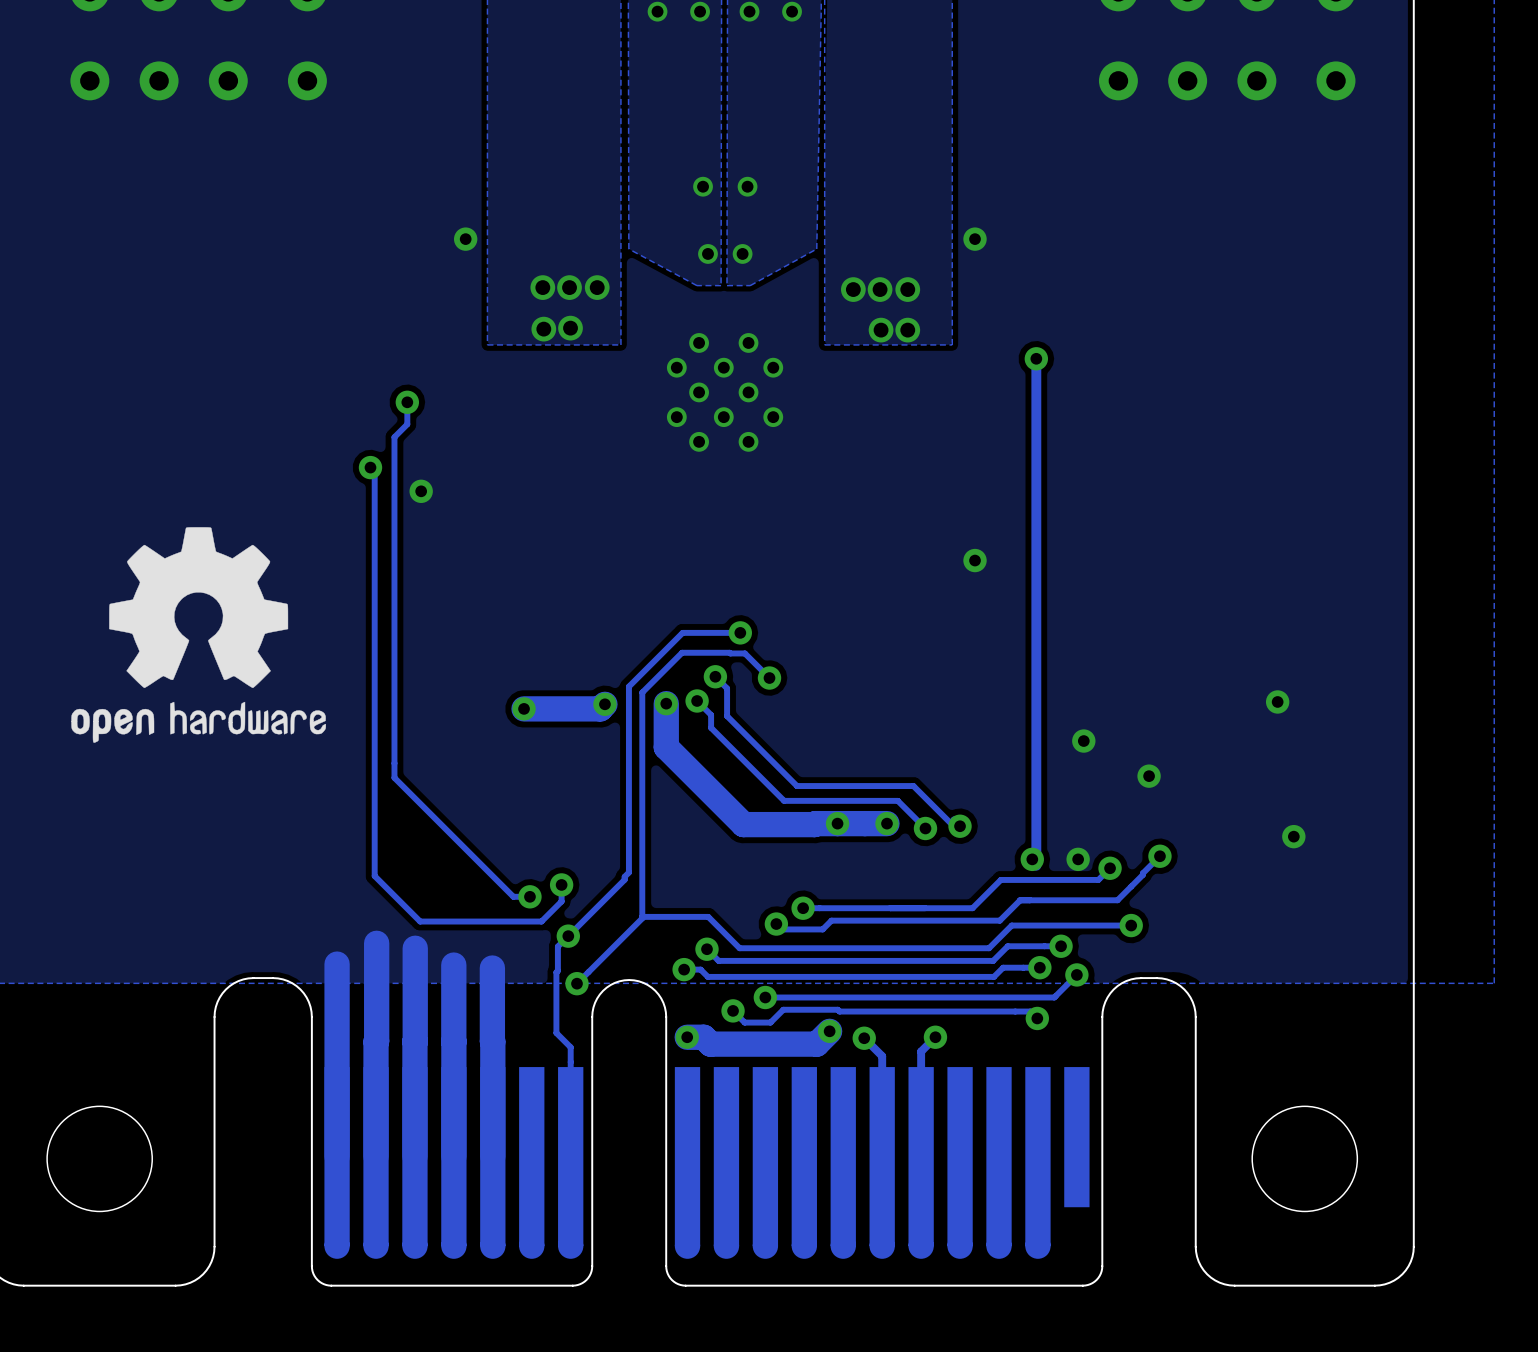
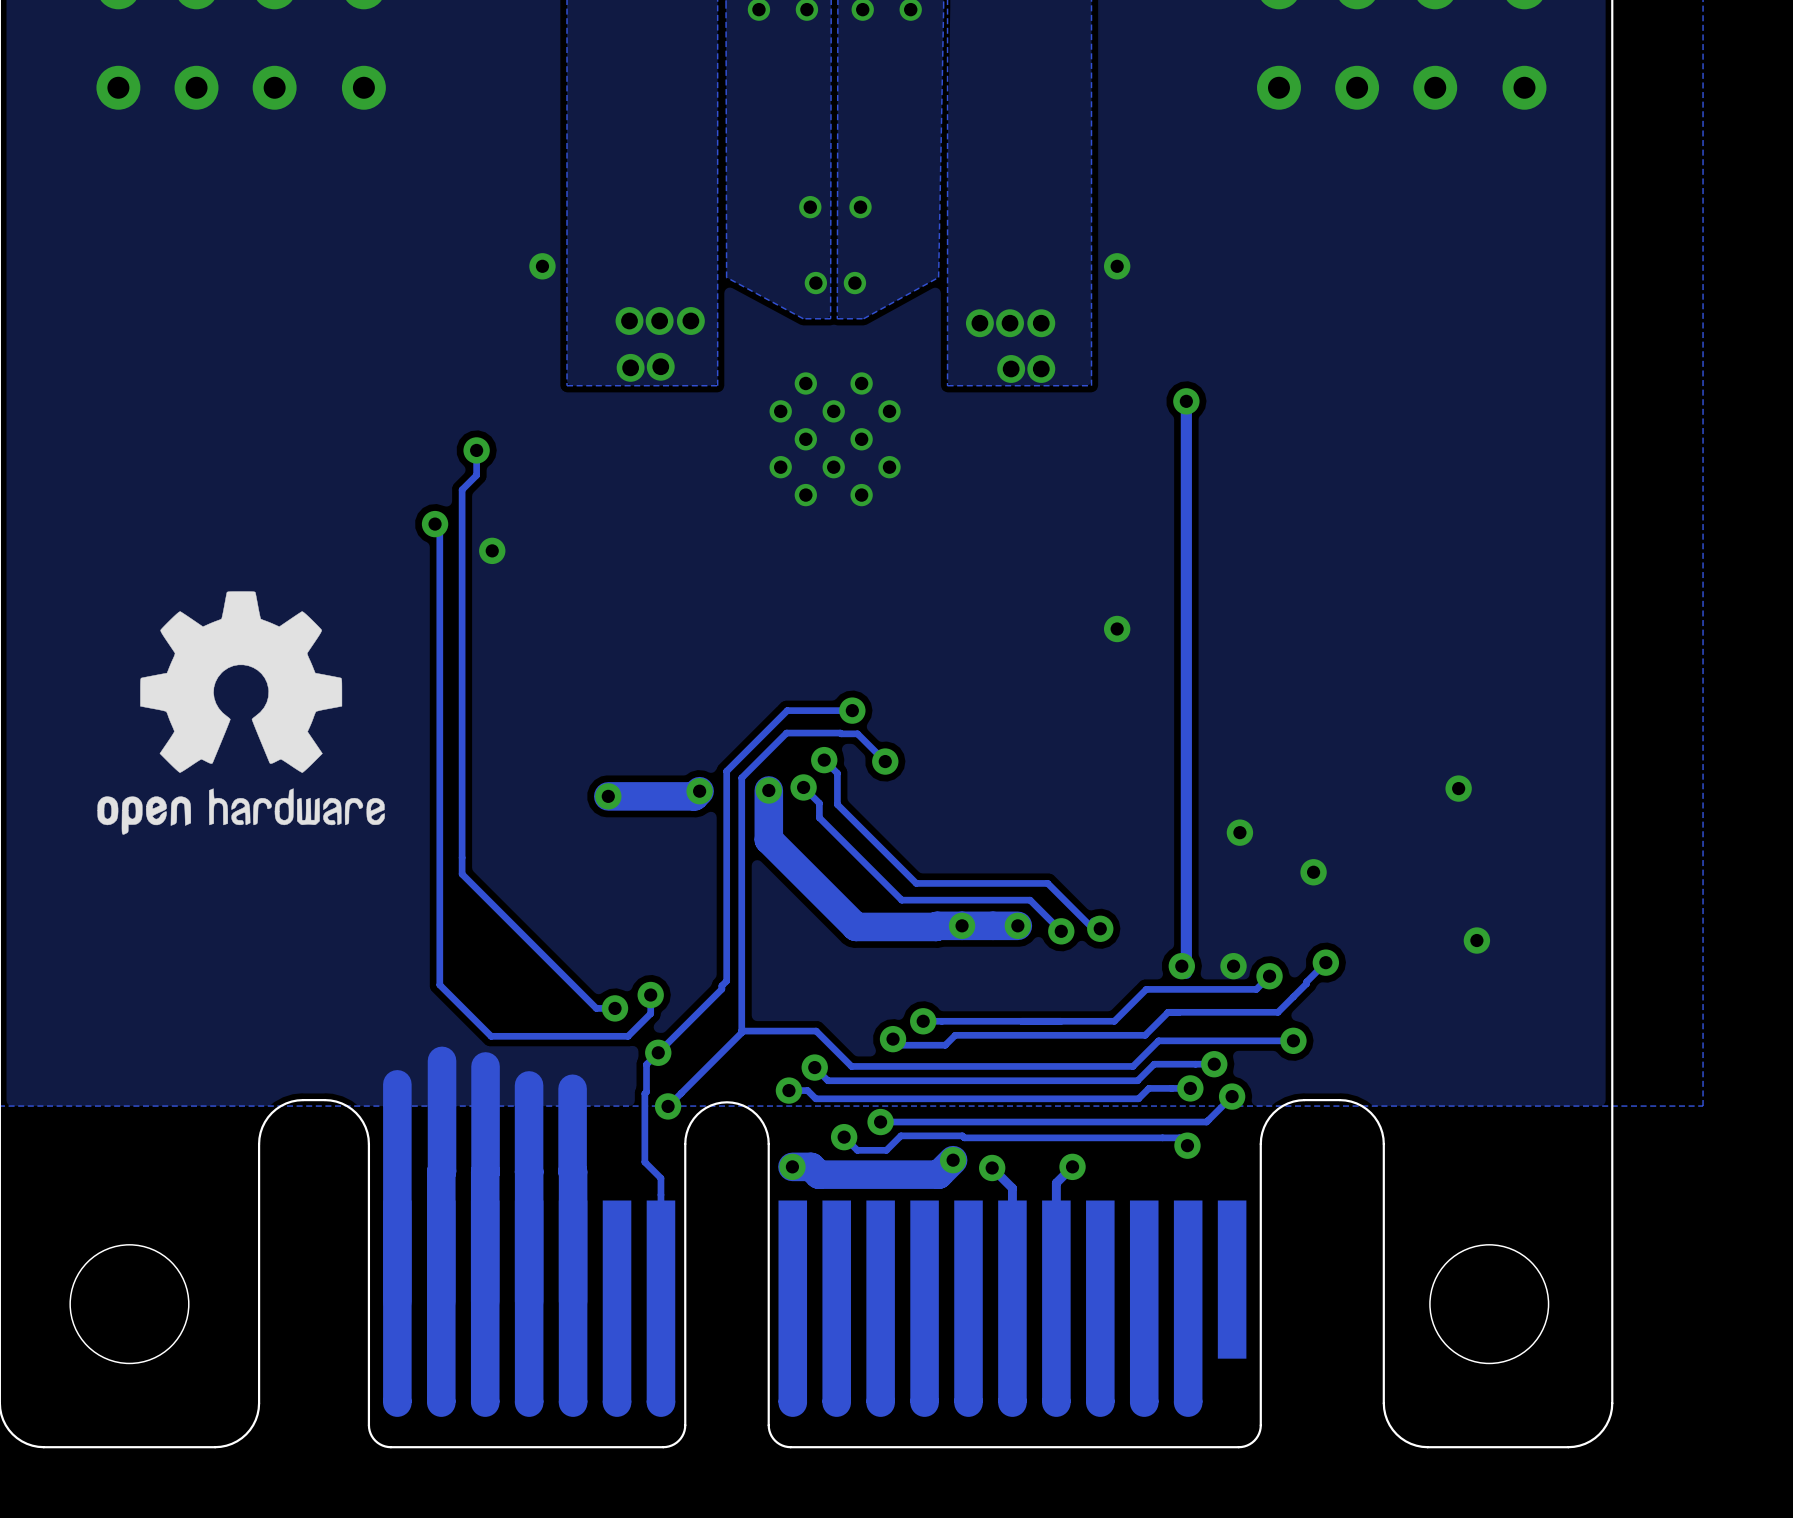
board edge: (1156, 978) (1171, 981) (1184, 989) (1192, 1002) (1195, 1011) (1197, 1256) (1203, 1270) (1215, 1280) (1229, 1285) (1250, 1285) -> (1322, 1100) (1345, 1100) (1361, 1105) (1374, 1117) (1382, 1132) (1384, 1408) (1387, 1420) (1396, 1434) (1410, 1443) (1427, 1447)

